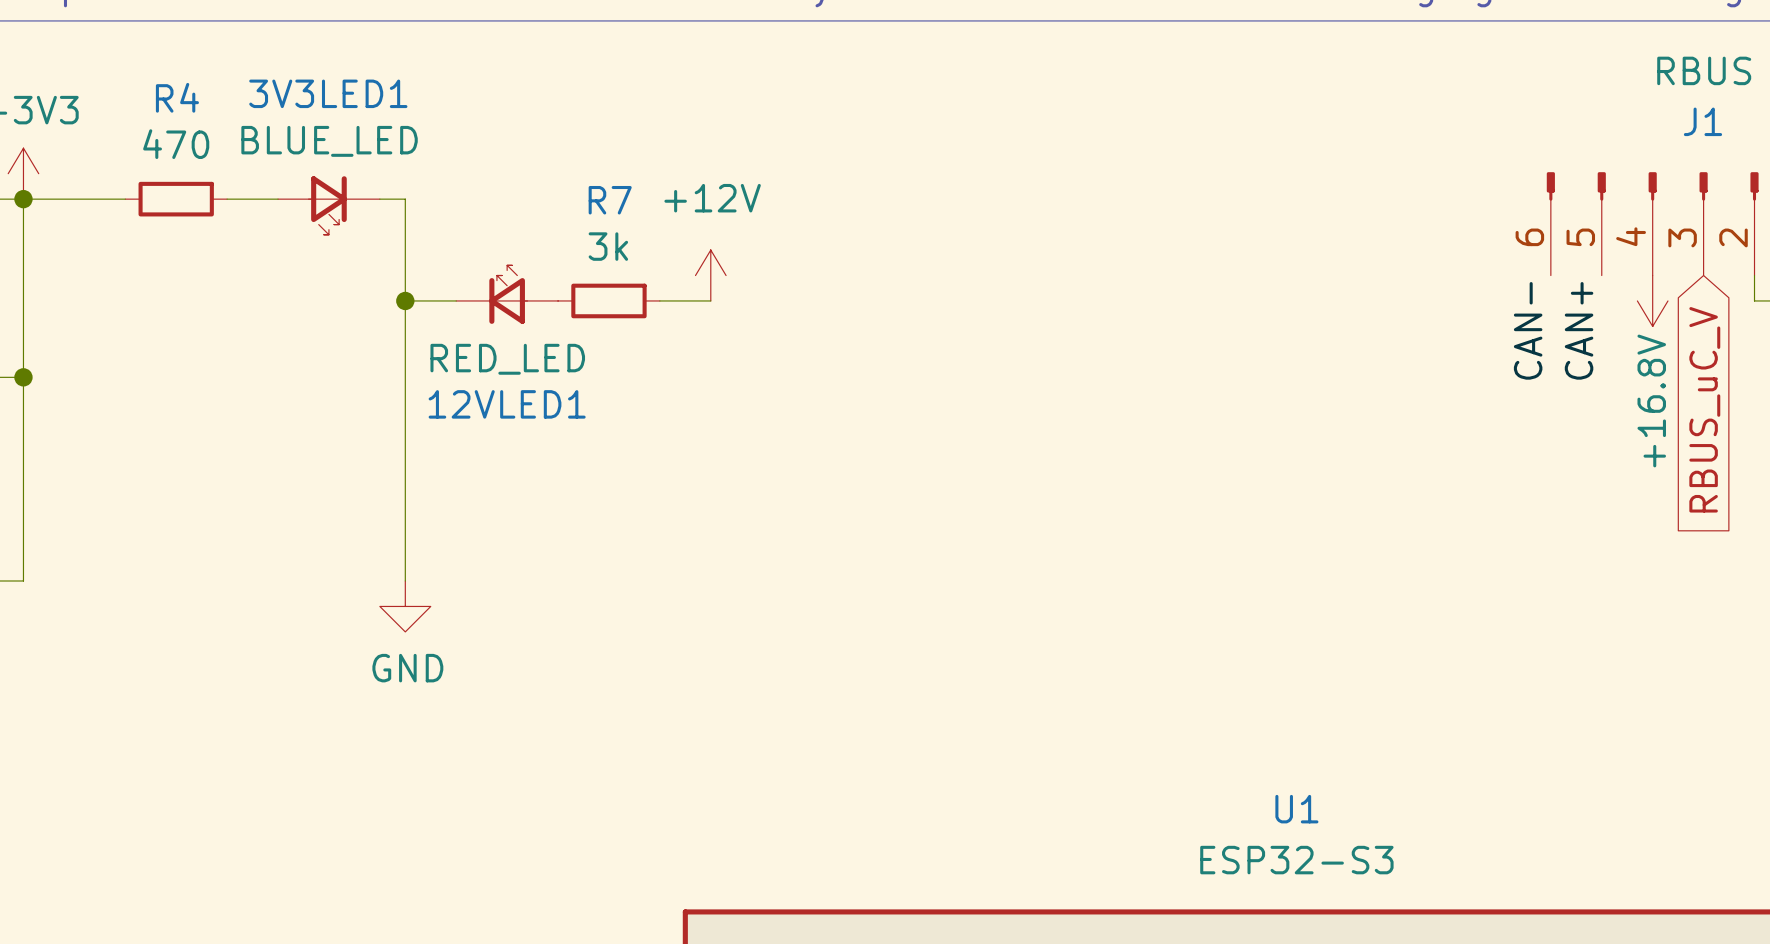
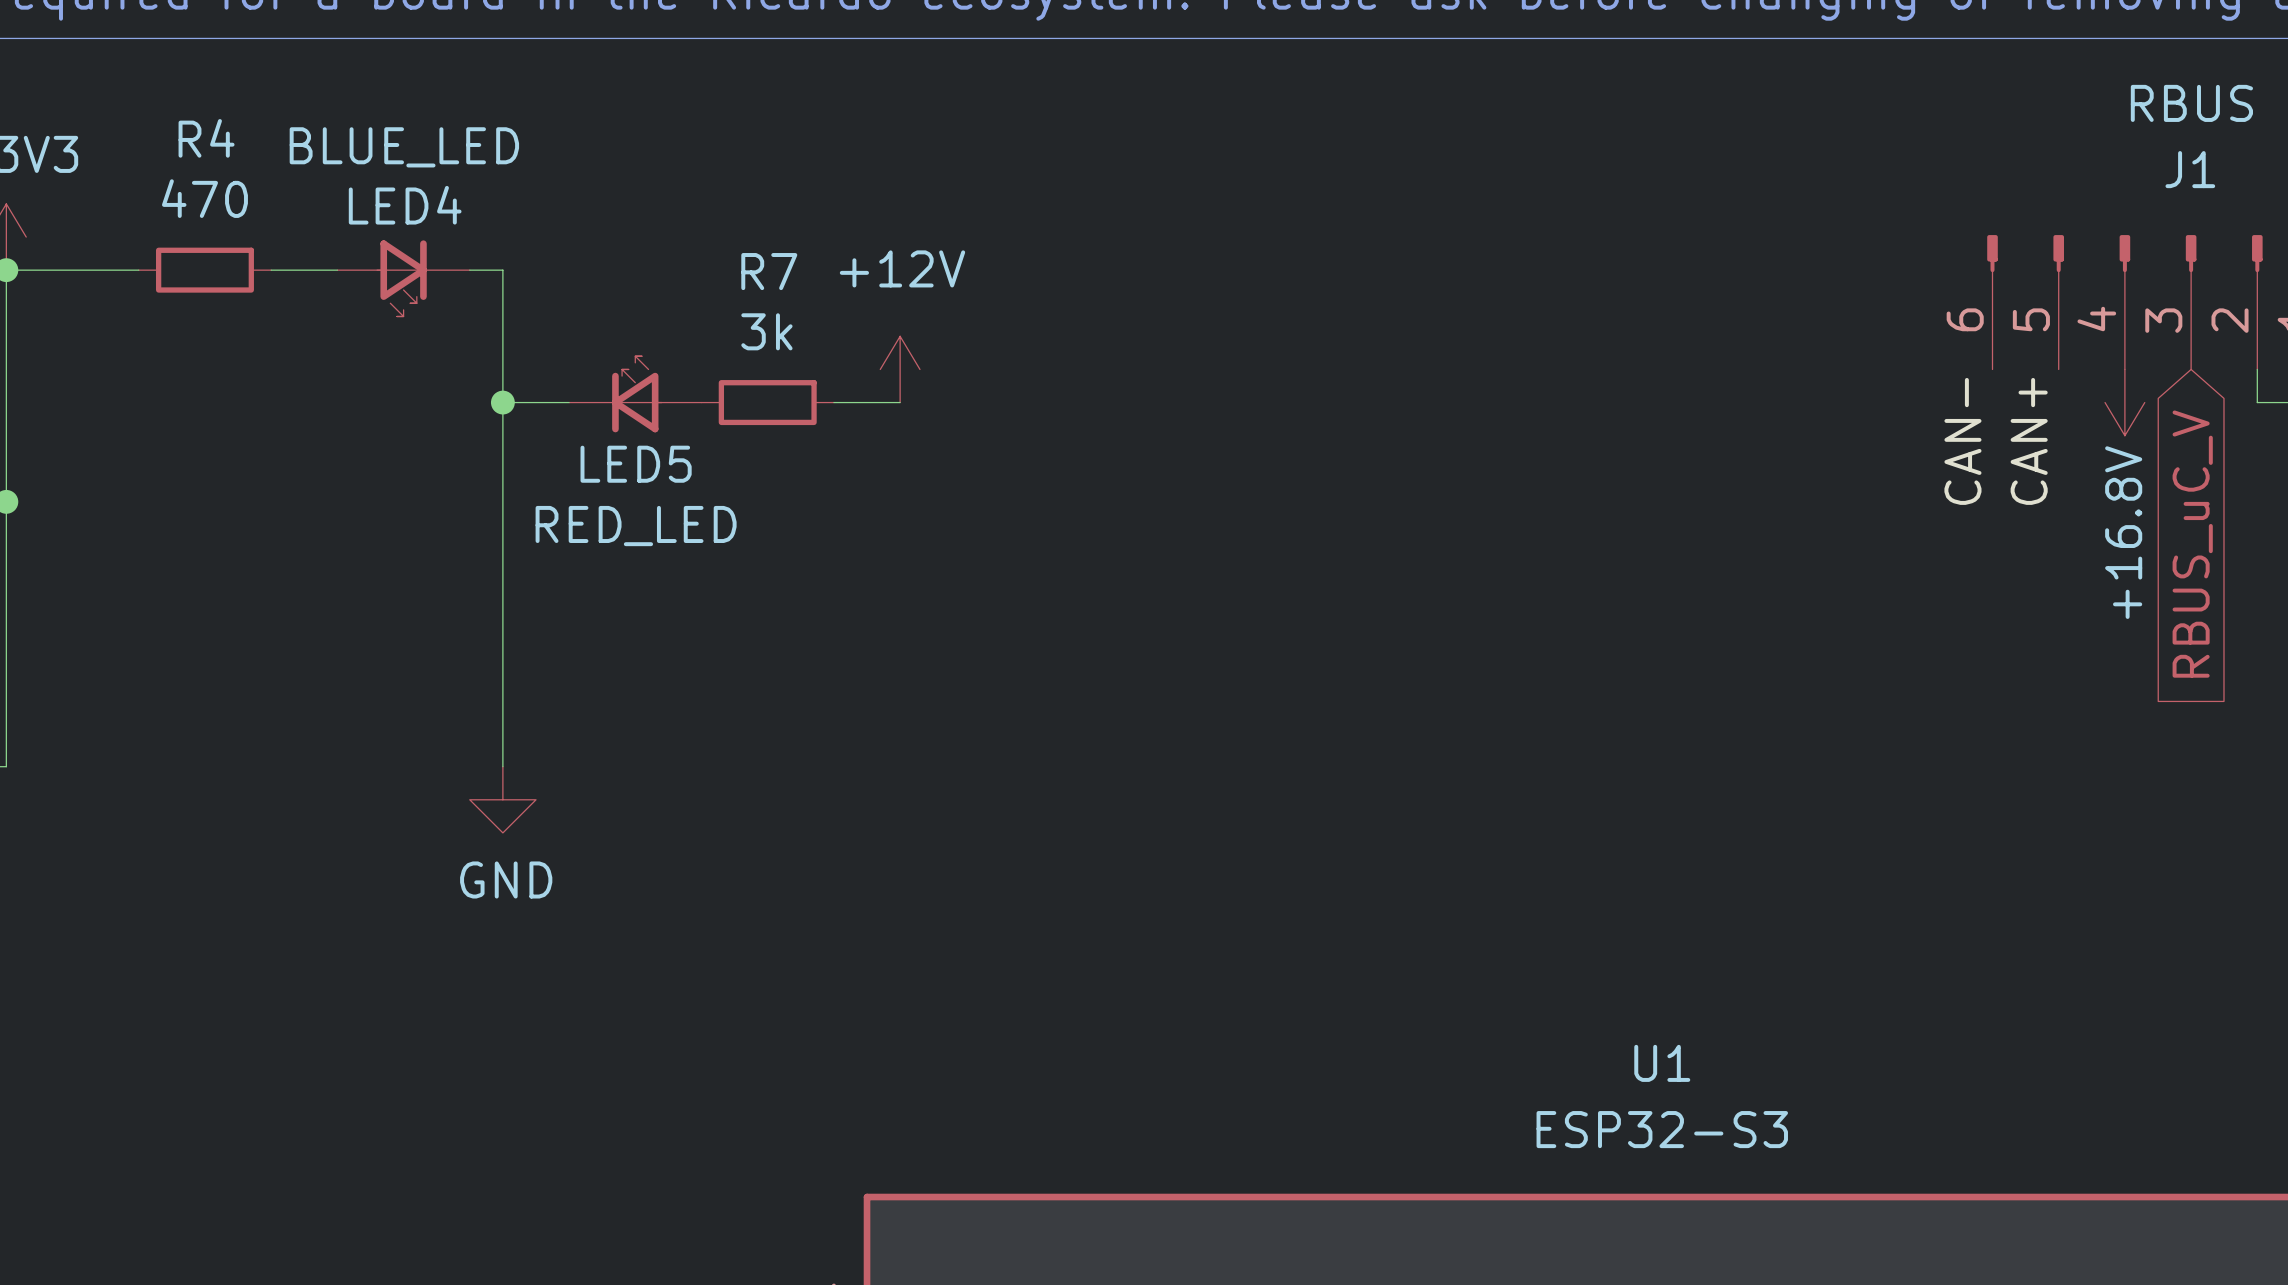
3V3LED1 name: 3V3LED1 (328, 93) -> LED4 (405, 205)
3V3LED1 value position: BLUE_LED (329, 141) -> BLUE_LED (404, 147)
12VLED1 value position: RED_LED (507, 359) -> RED_LED (636, 526)
12VLED1 name: 12VLED1 (507, 404) -> LED5 (636, 464)

